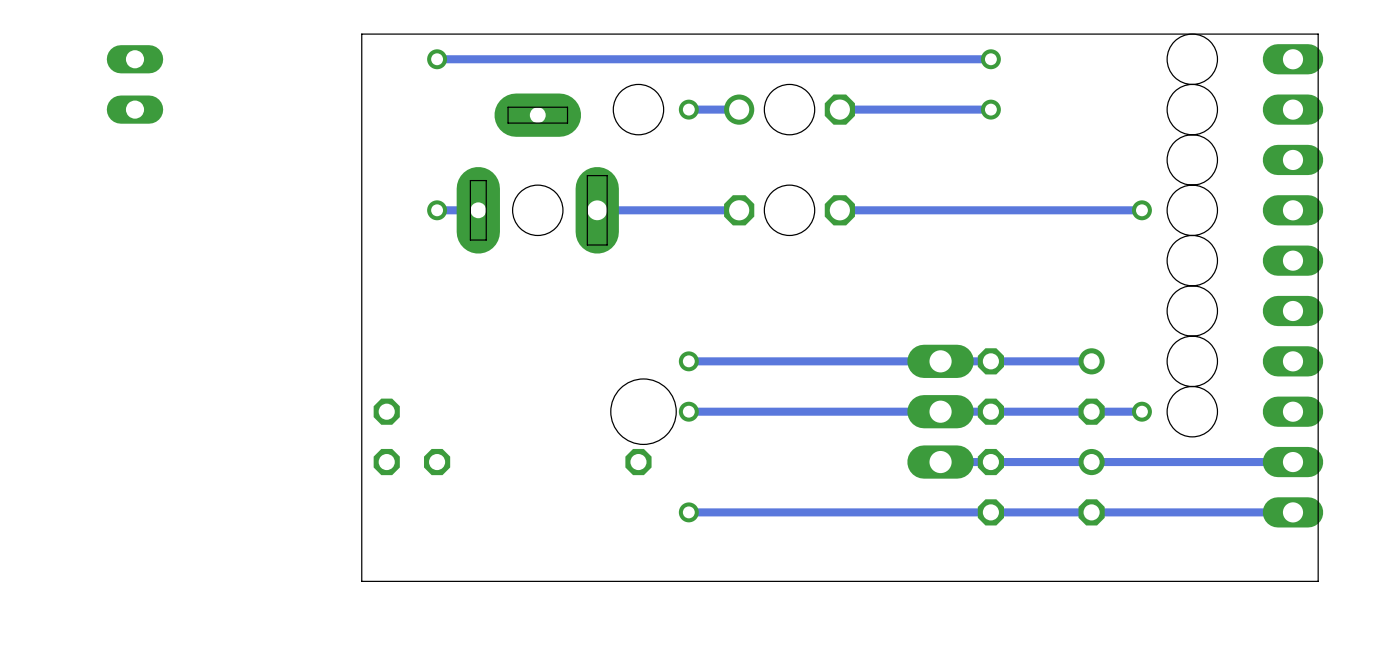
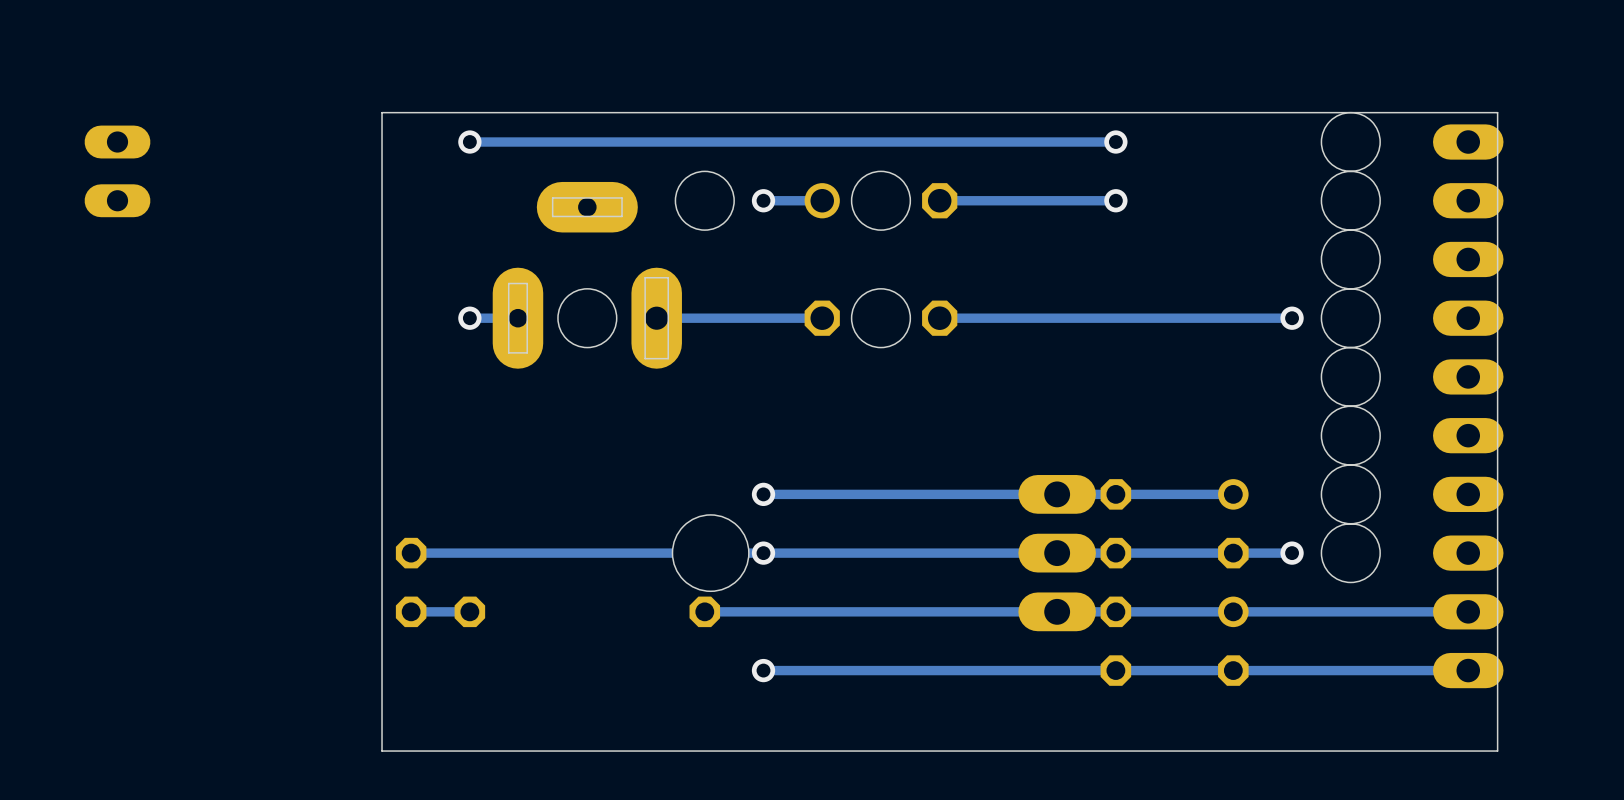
track: none -> (763, 553) (411, 553)
track: none -> (469, 611) (411, 611)
track: none -> (1057, 611) (704, 611)

